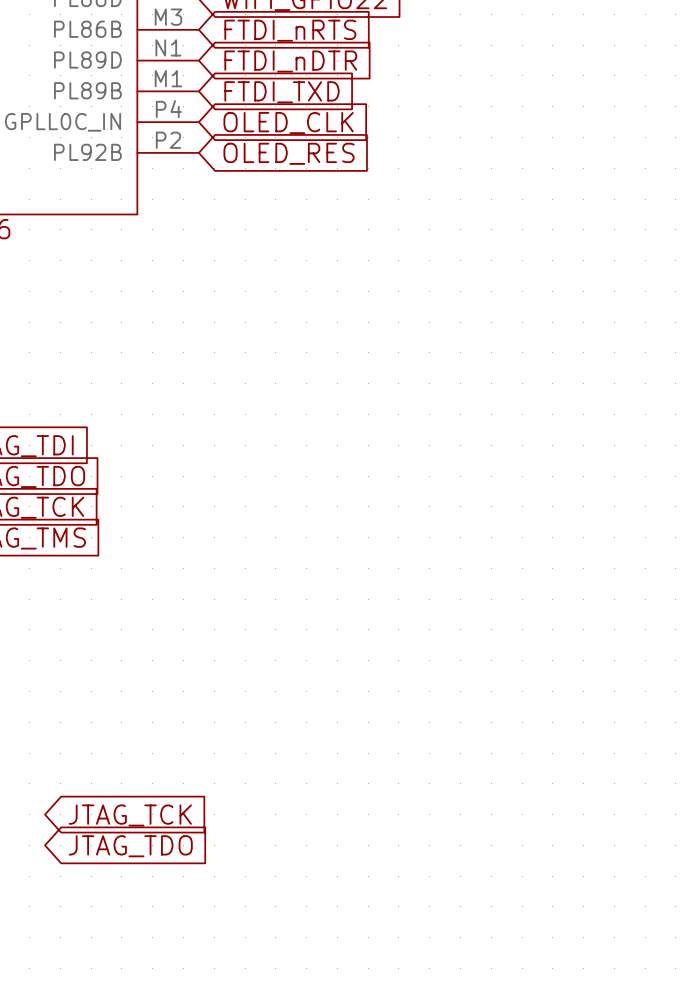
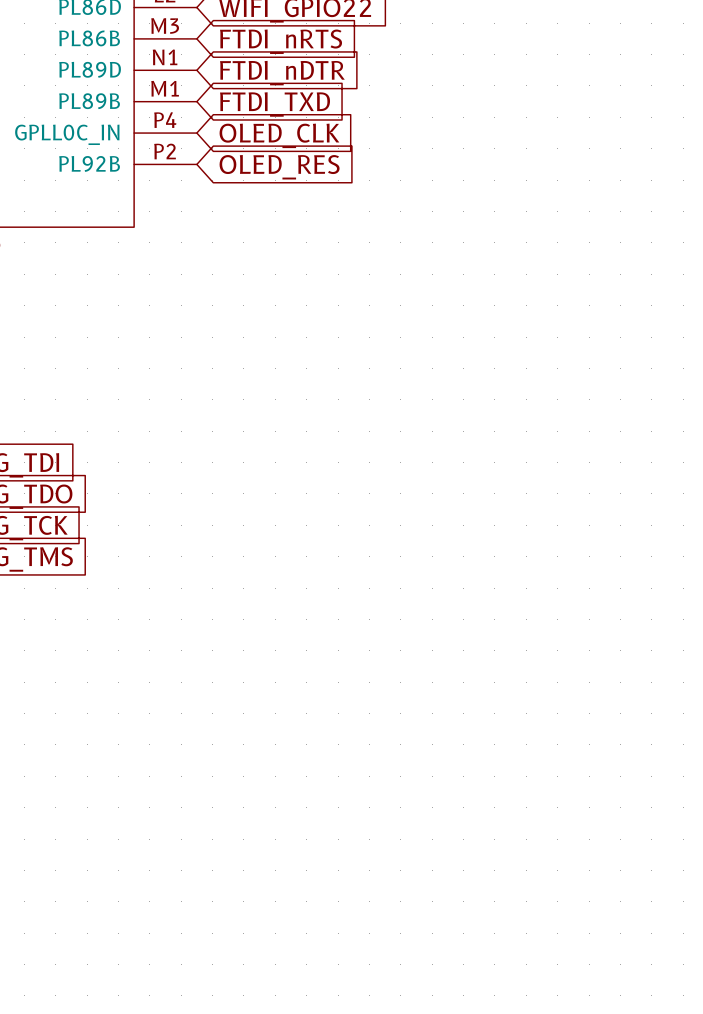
global label: JTAG_TCK (130, 815) -> none
global label: JTAG_TDO (130, 846) -> none

